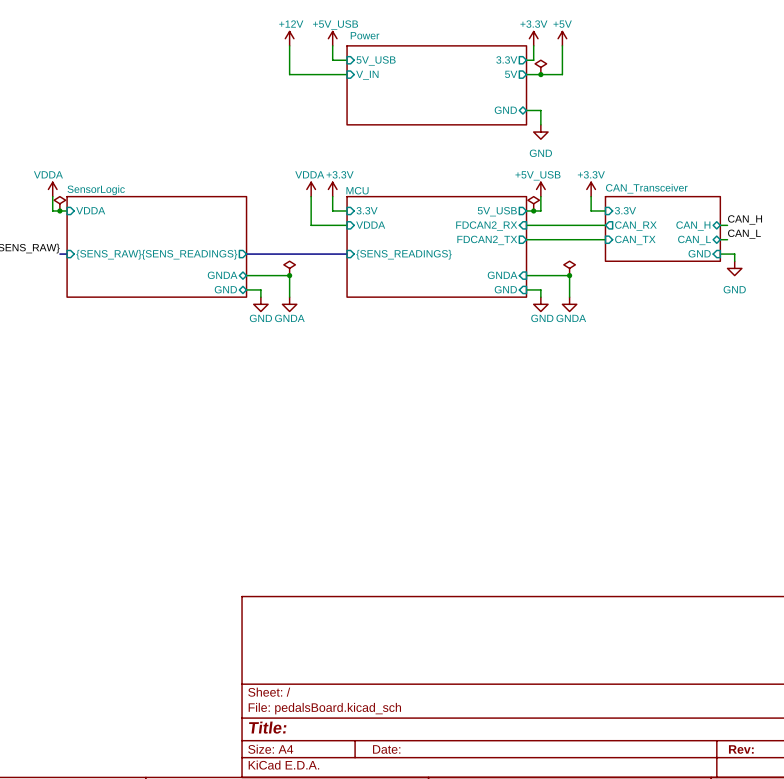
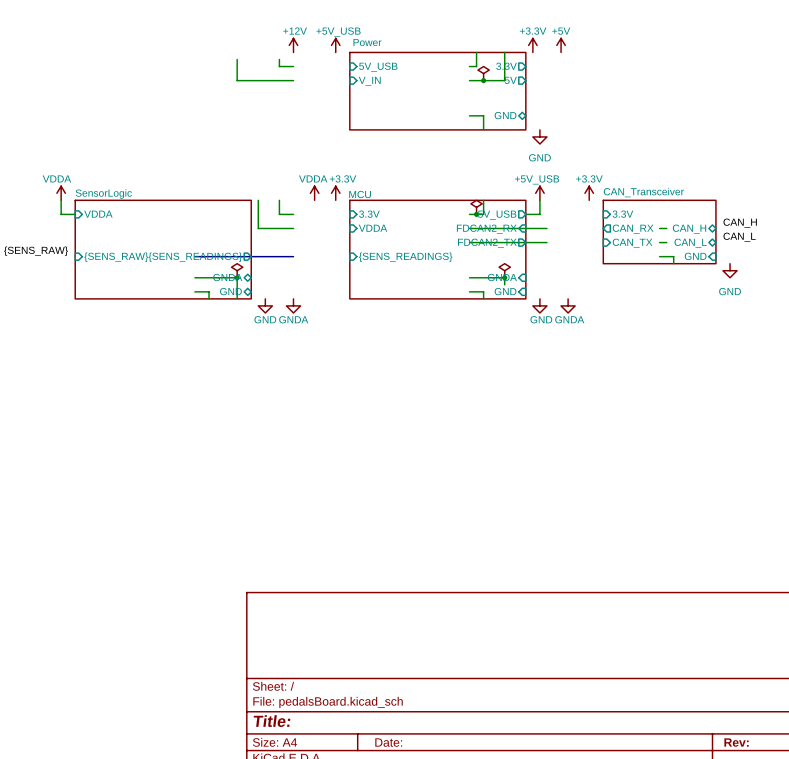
wire: (289, 45) (289, 74) (347, 74) -> none
wire: (332, 45) (332, 60) (347, 60) -> none
wire: (533, 45) (533, 60) (526, 60) -> (476, 52) (476, 66) (469, 66)
wire: (562, 45) (562, 74) (526, 74) -> (504, 52) (504, 80) (469, 80)
wire: none -> (237, 59) (237, 80) (293, 80)
wire: none -> (279, 59) (279, 66) (293, 66)
power symbol position: (540, 67) -> (483, 73)
junction: none -> (483, 80)
junction: (540, 74) -> none
wire: (526, 110) (540, 110) (540, 124) -> (469, 115) (483, 115) (483, 129)
wire: (311, 196) (311, 225) (347, 225) -> (258, 200) (258, 228) (293, 228)
wire: (332, 196) (332, 210) (347, 210) -> (279, 200) (279, 214) (293, 214)
wire: none -> (483, 200) (483, 214) (469, 214)
wire: (591, 196) (591, 210) (605, 210) -> none
power symbol: (59, 203) -> none
power symbol: none -> (476, 207)
power symbol: (533, 203) -> none
junction: (59, 210) -> none
junction: none -> (476, 214)
junction: (533, 210) -> none
wire: (548, 225) (605, 225) -> (469, 228) (525, 228)
wire: (720, 225) (727, 225) -> (659, 228) (666, 228)
wire: (548, 239) (605, 239) -> (469, 242) (525, 242)
wire: (720, 239) (727, 239) -> (659, 242) (666, 242)
bus: (59, 254) (67, 254) -> none
bus: (289, 254) (347, 254) -> (194, 256) (251, 256)
wire: (720, 254) (734, 254) (734, 261) -> (659, 256) (673, 256) (673, 263)
power symbol position: (289, 268) -> (237, 270)
power symbol: none -> (504, 270)
power symbol: (569, 268) -> none
junction: none -> (237, 277)
wire: (246, 275) (289, 275) (289, 297) -> (194, 277) (237, 277) (237, 298)
junction: (289, 275) -> none
wire: none -> (469, 277) (504, 277) (504, 284)
junction: none -> (504, 277)
wire: (526, 275) (569, 275) (569, 297) -> none
junction: (569, 275) -> none
wire: (246, 289) (260, 289) (260, 297) -> (194, 291) (209, 291) (209, 298)
wire: (526, 289) (540, 289) (540, 297) -> (469, 291) (483, 291) (483, 298)

